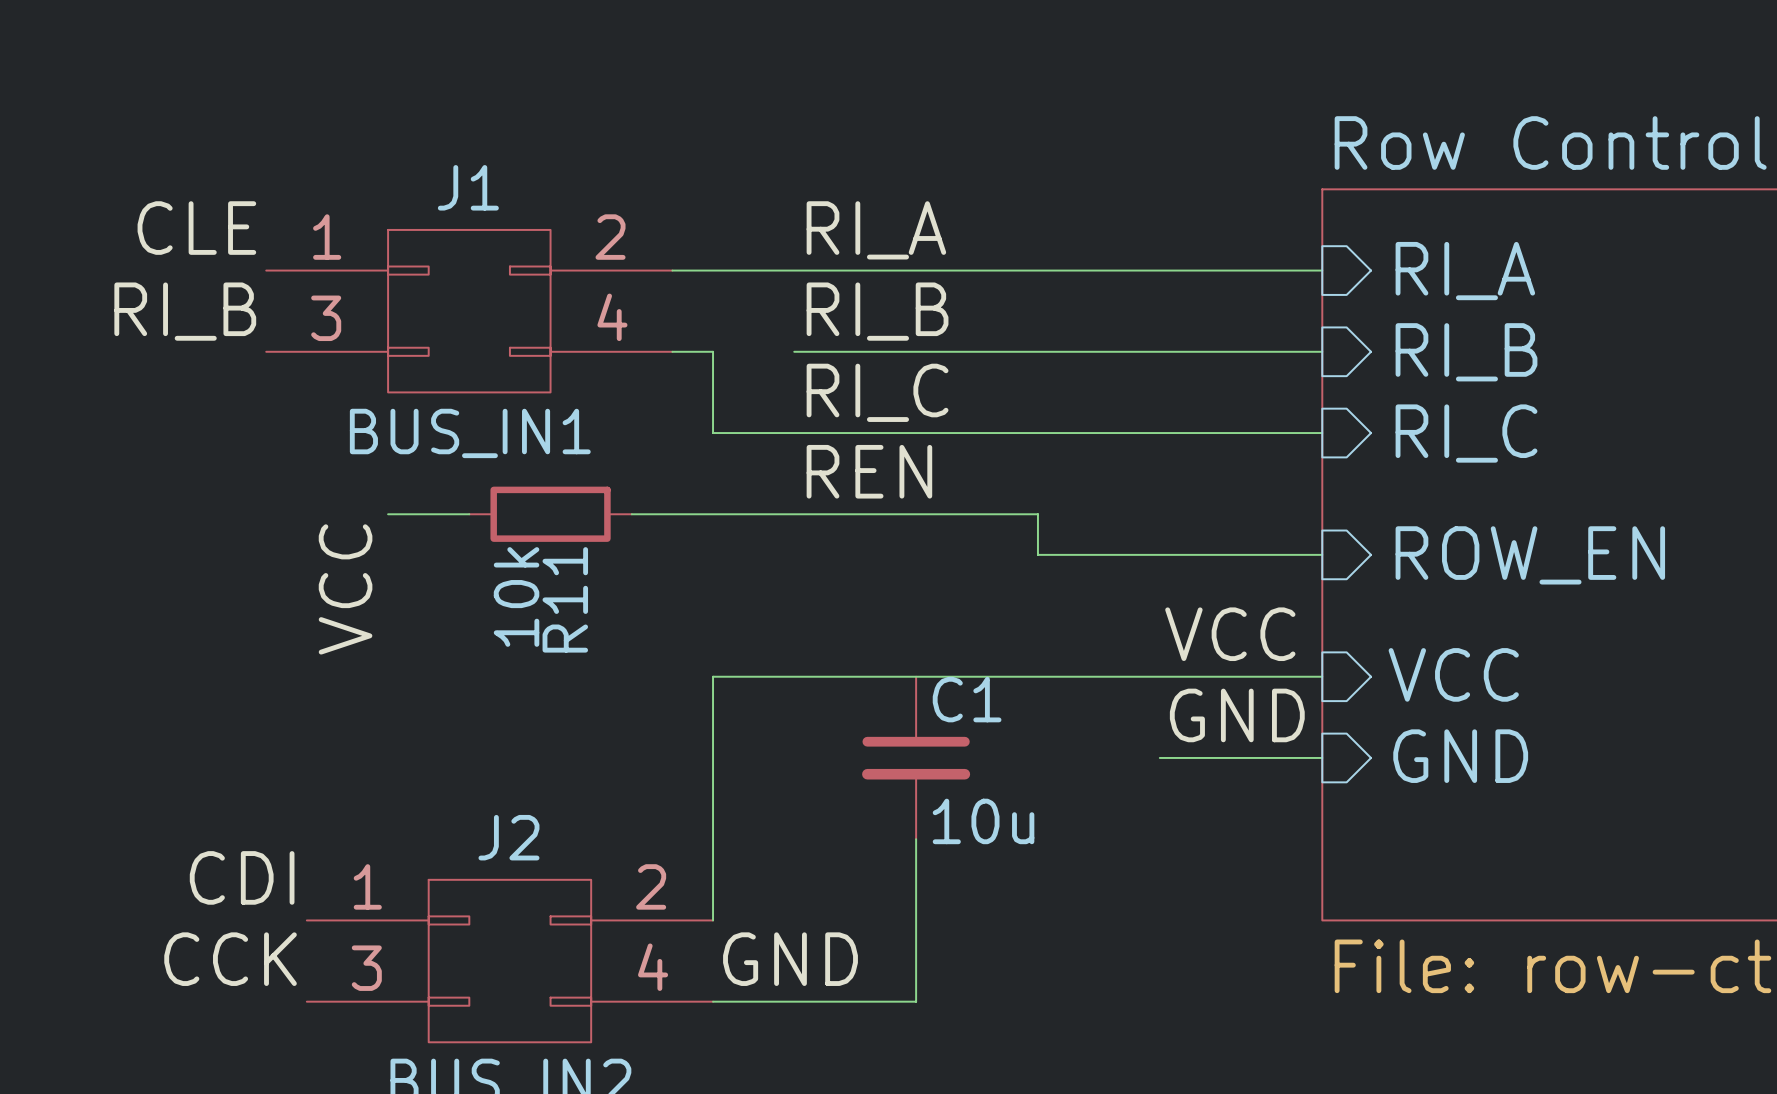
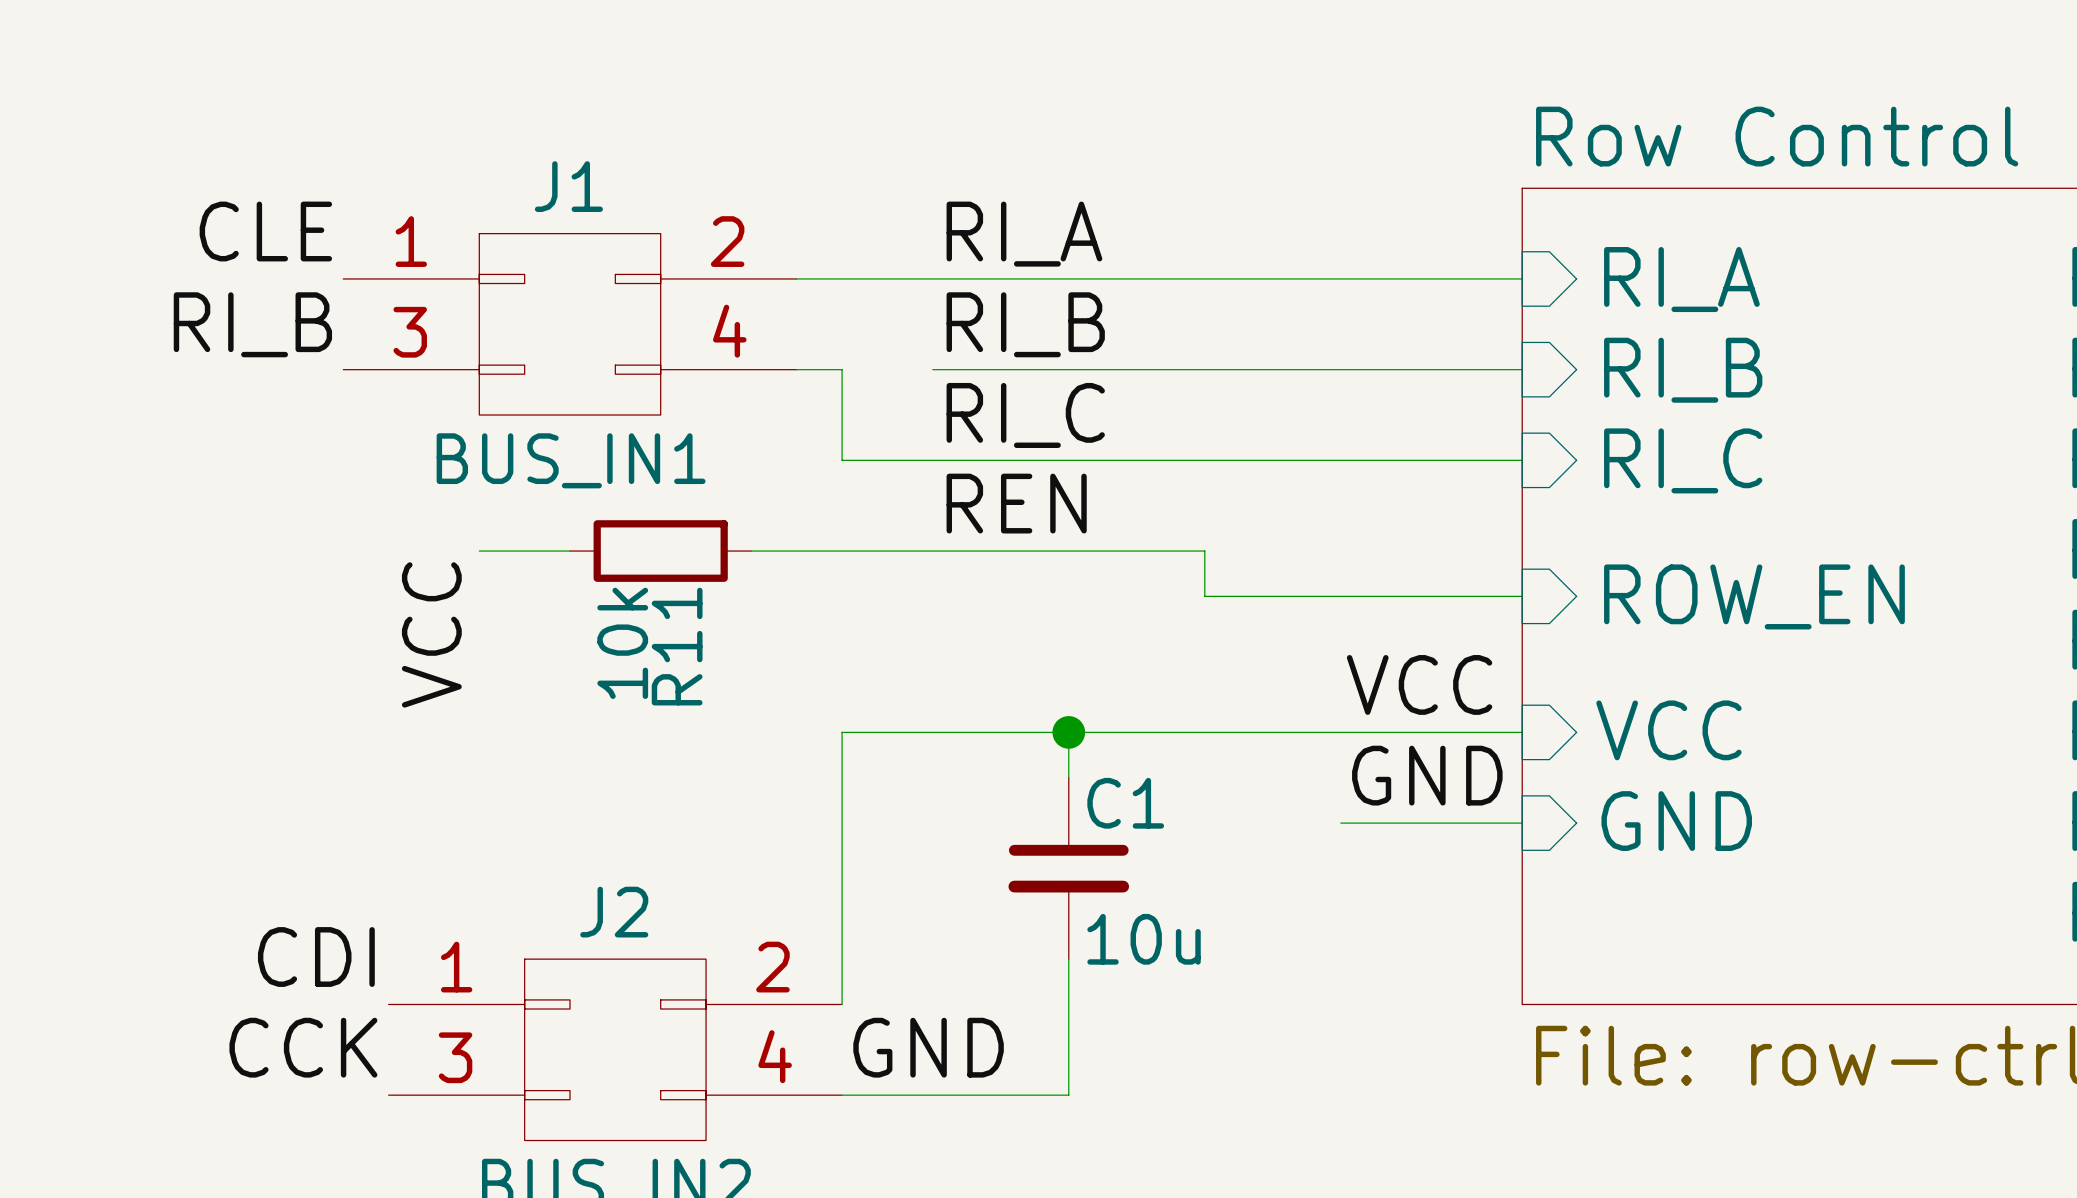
junction: none -> (1068, 732)
C1 position: (916, 757) -> (1068, 868)

